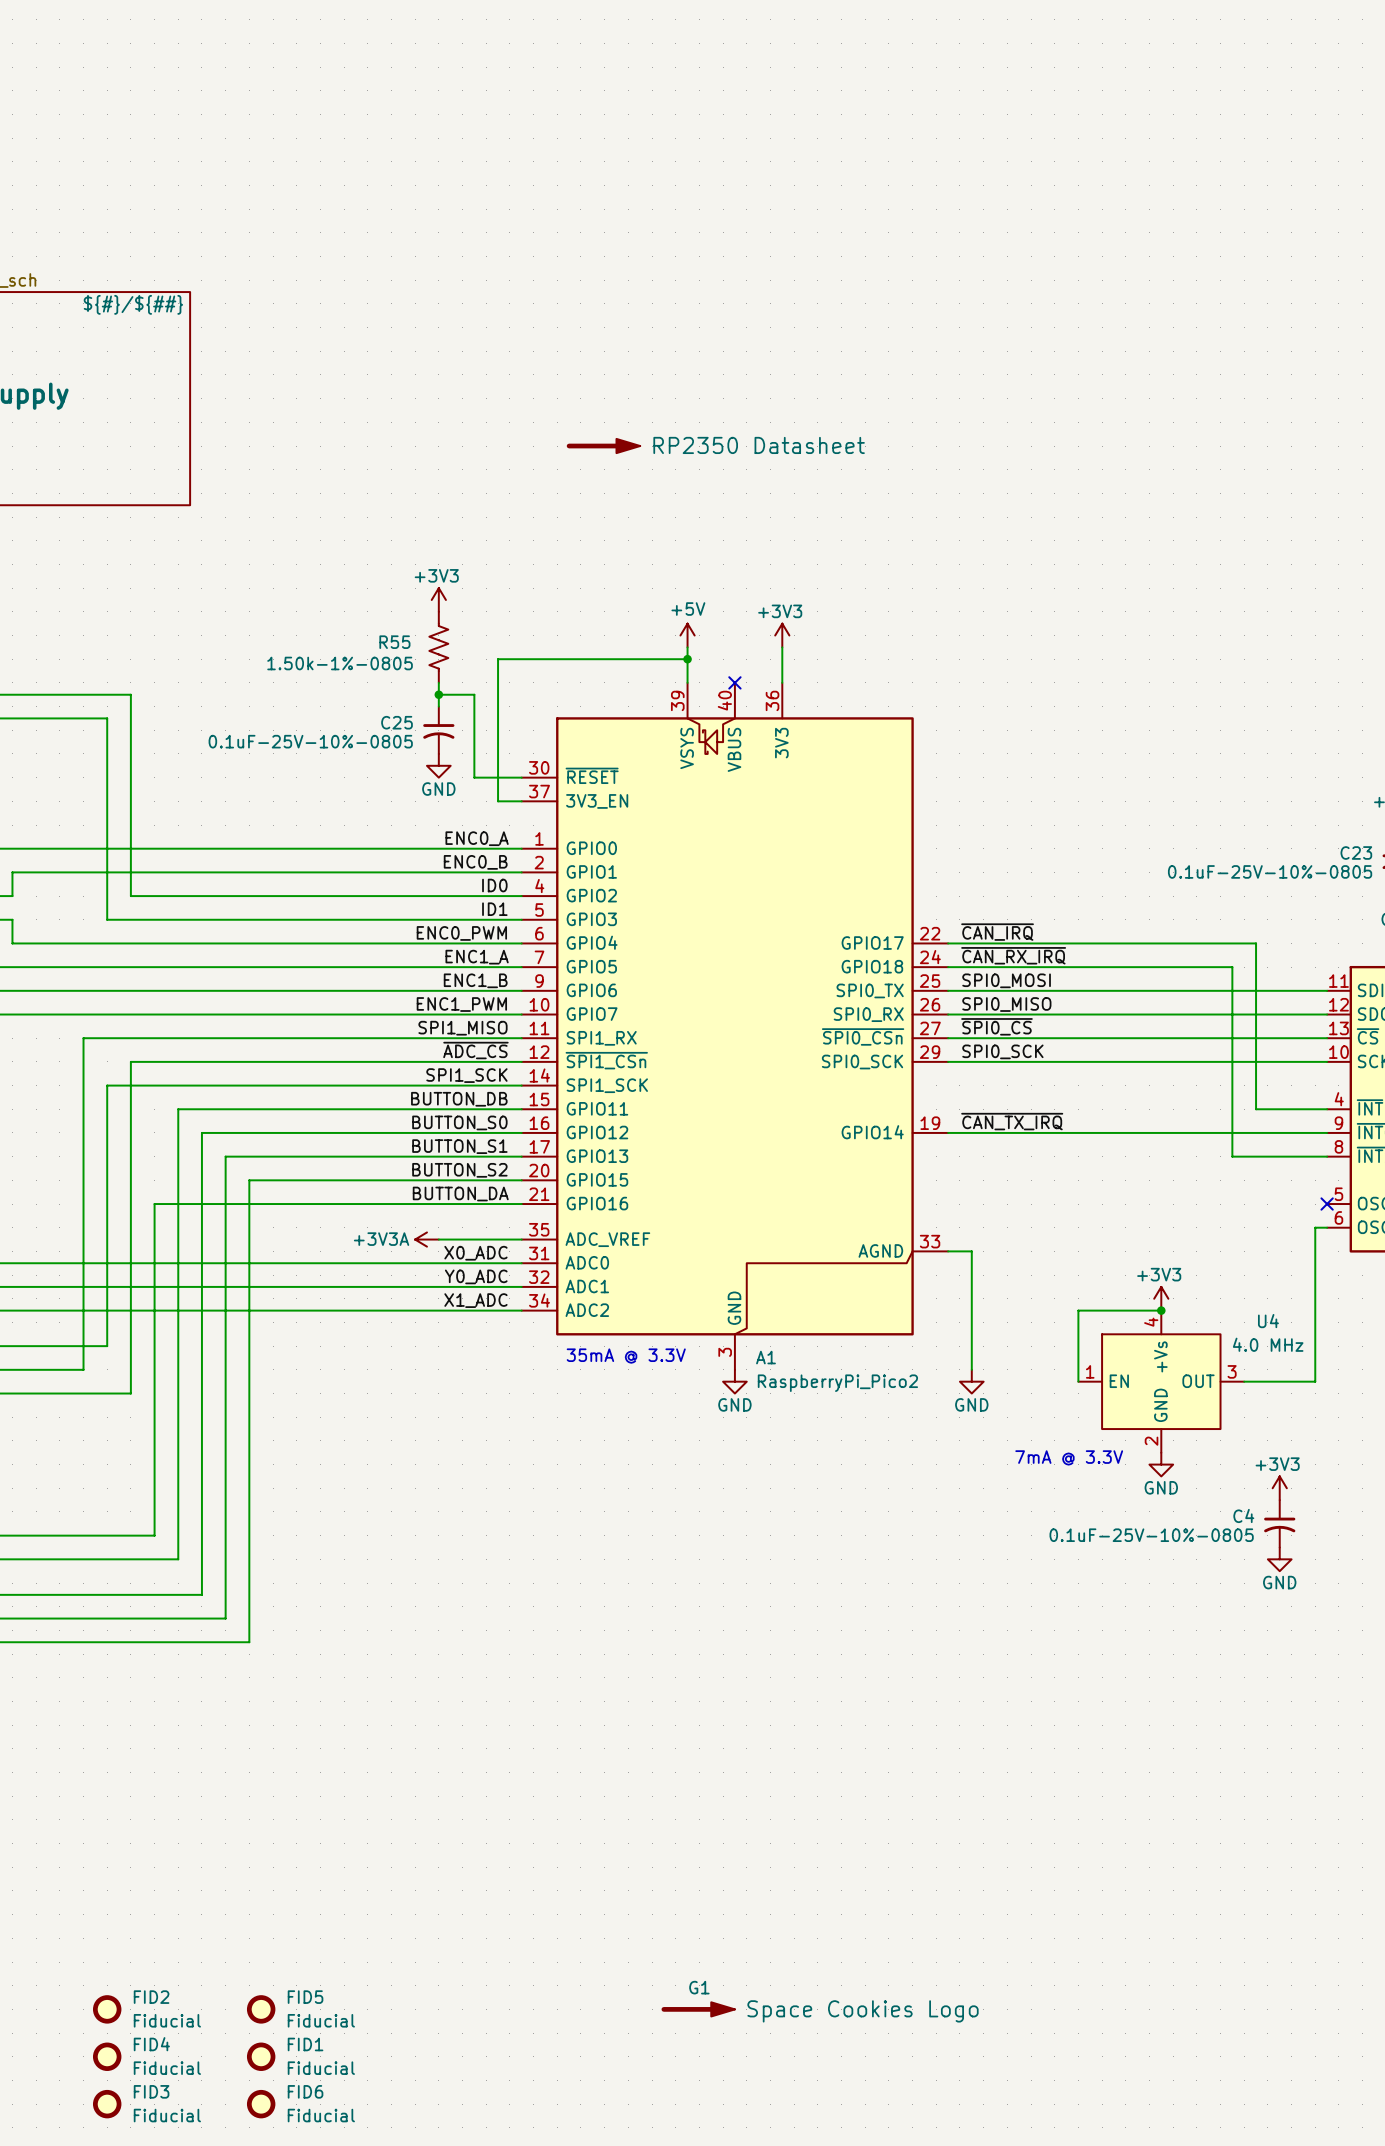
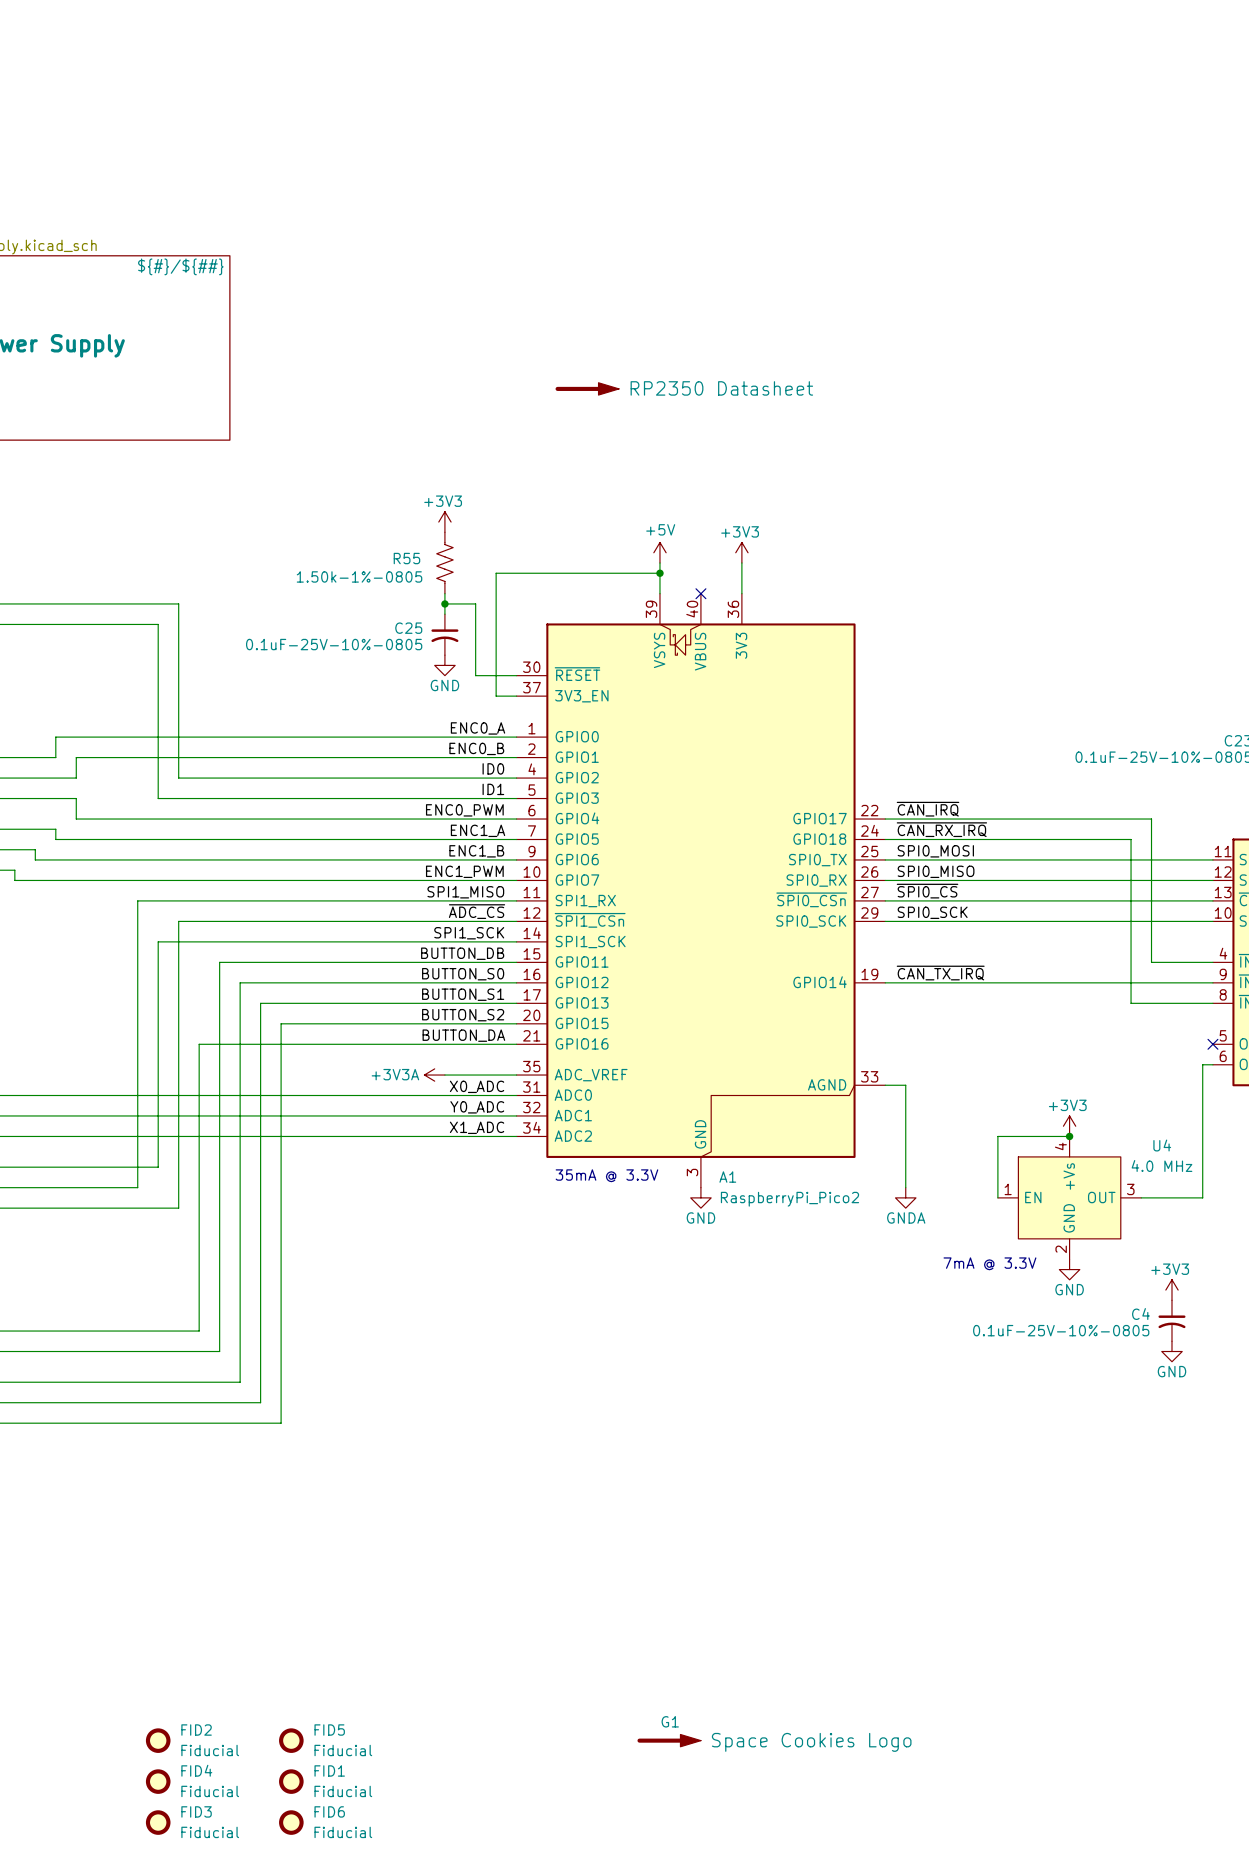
power symbol: GND (971, 1381) -> GNDA (905, 1197)

